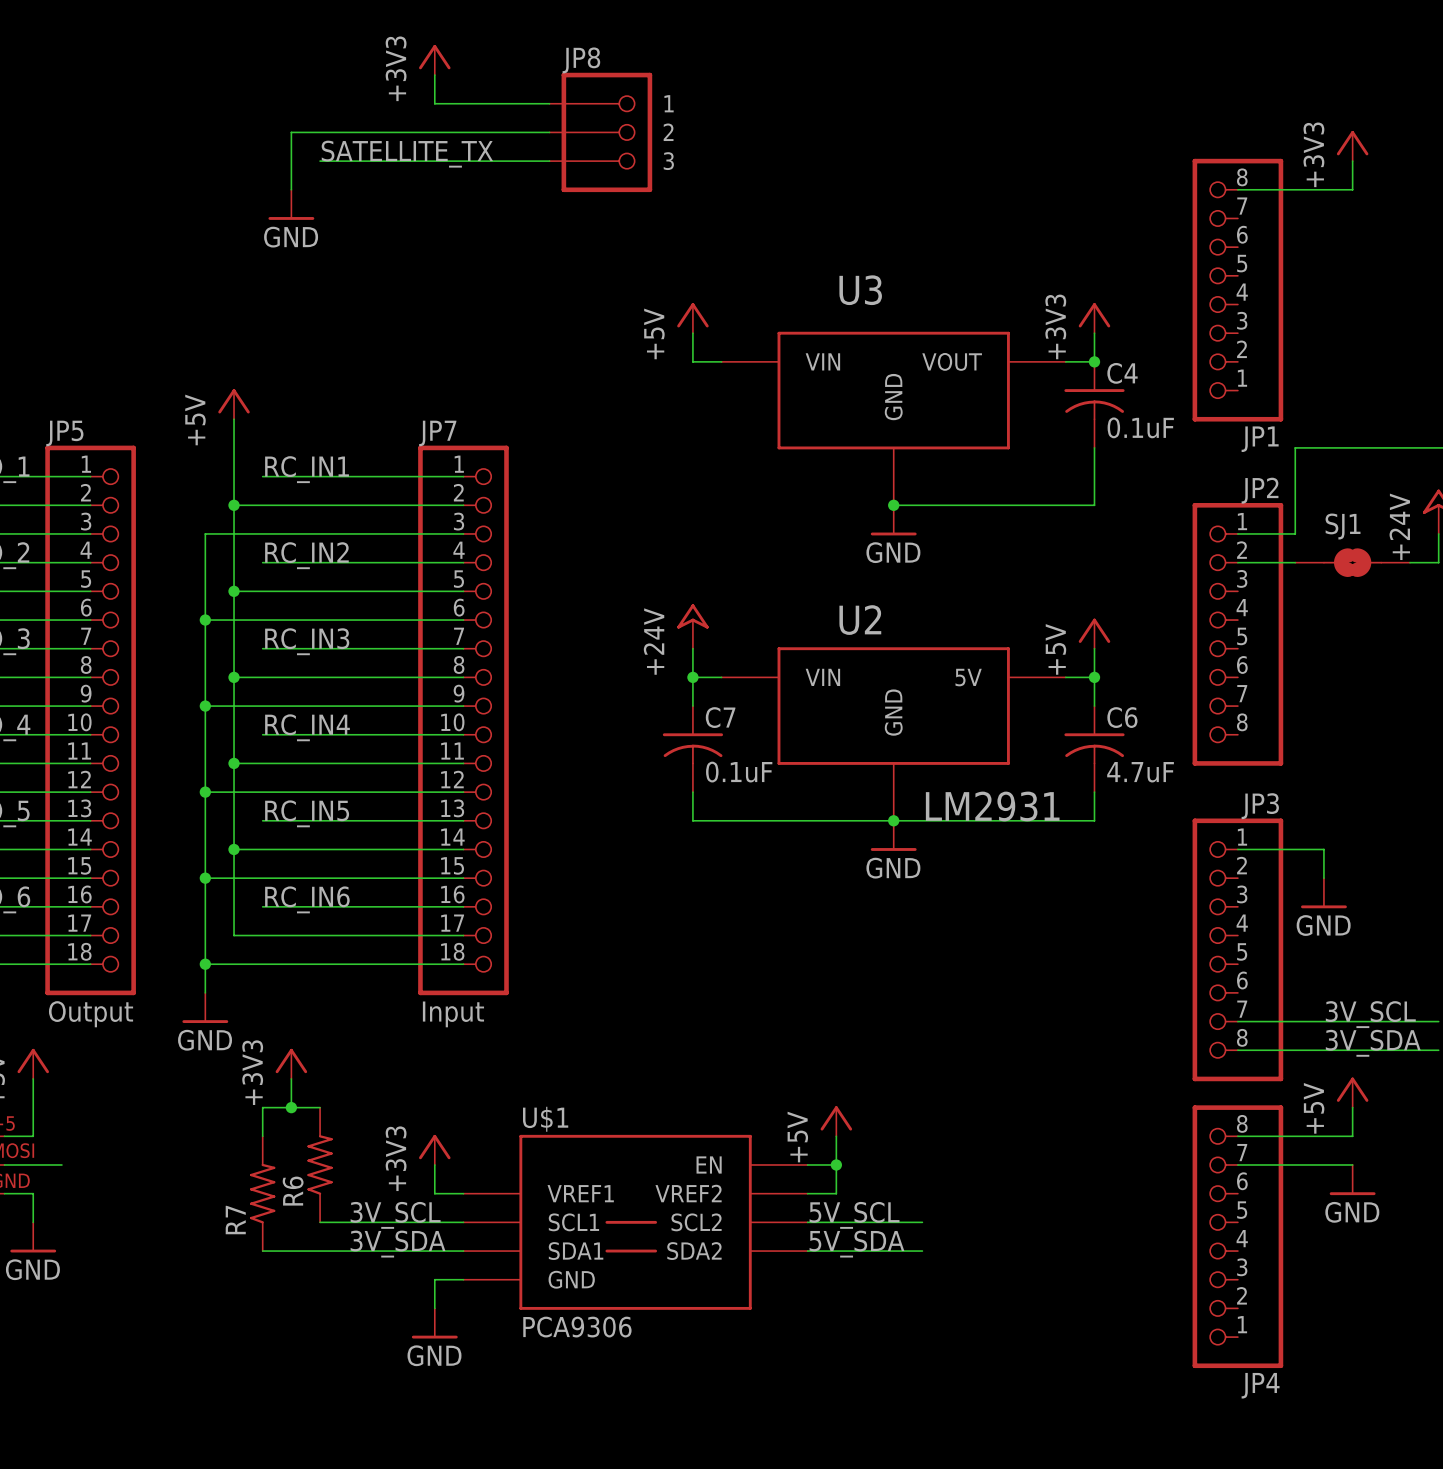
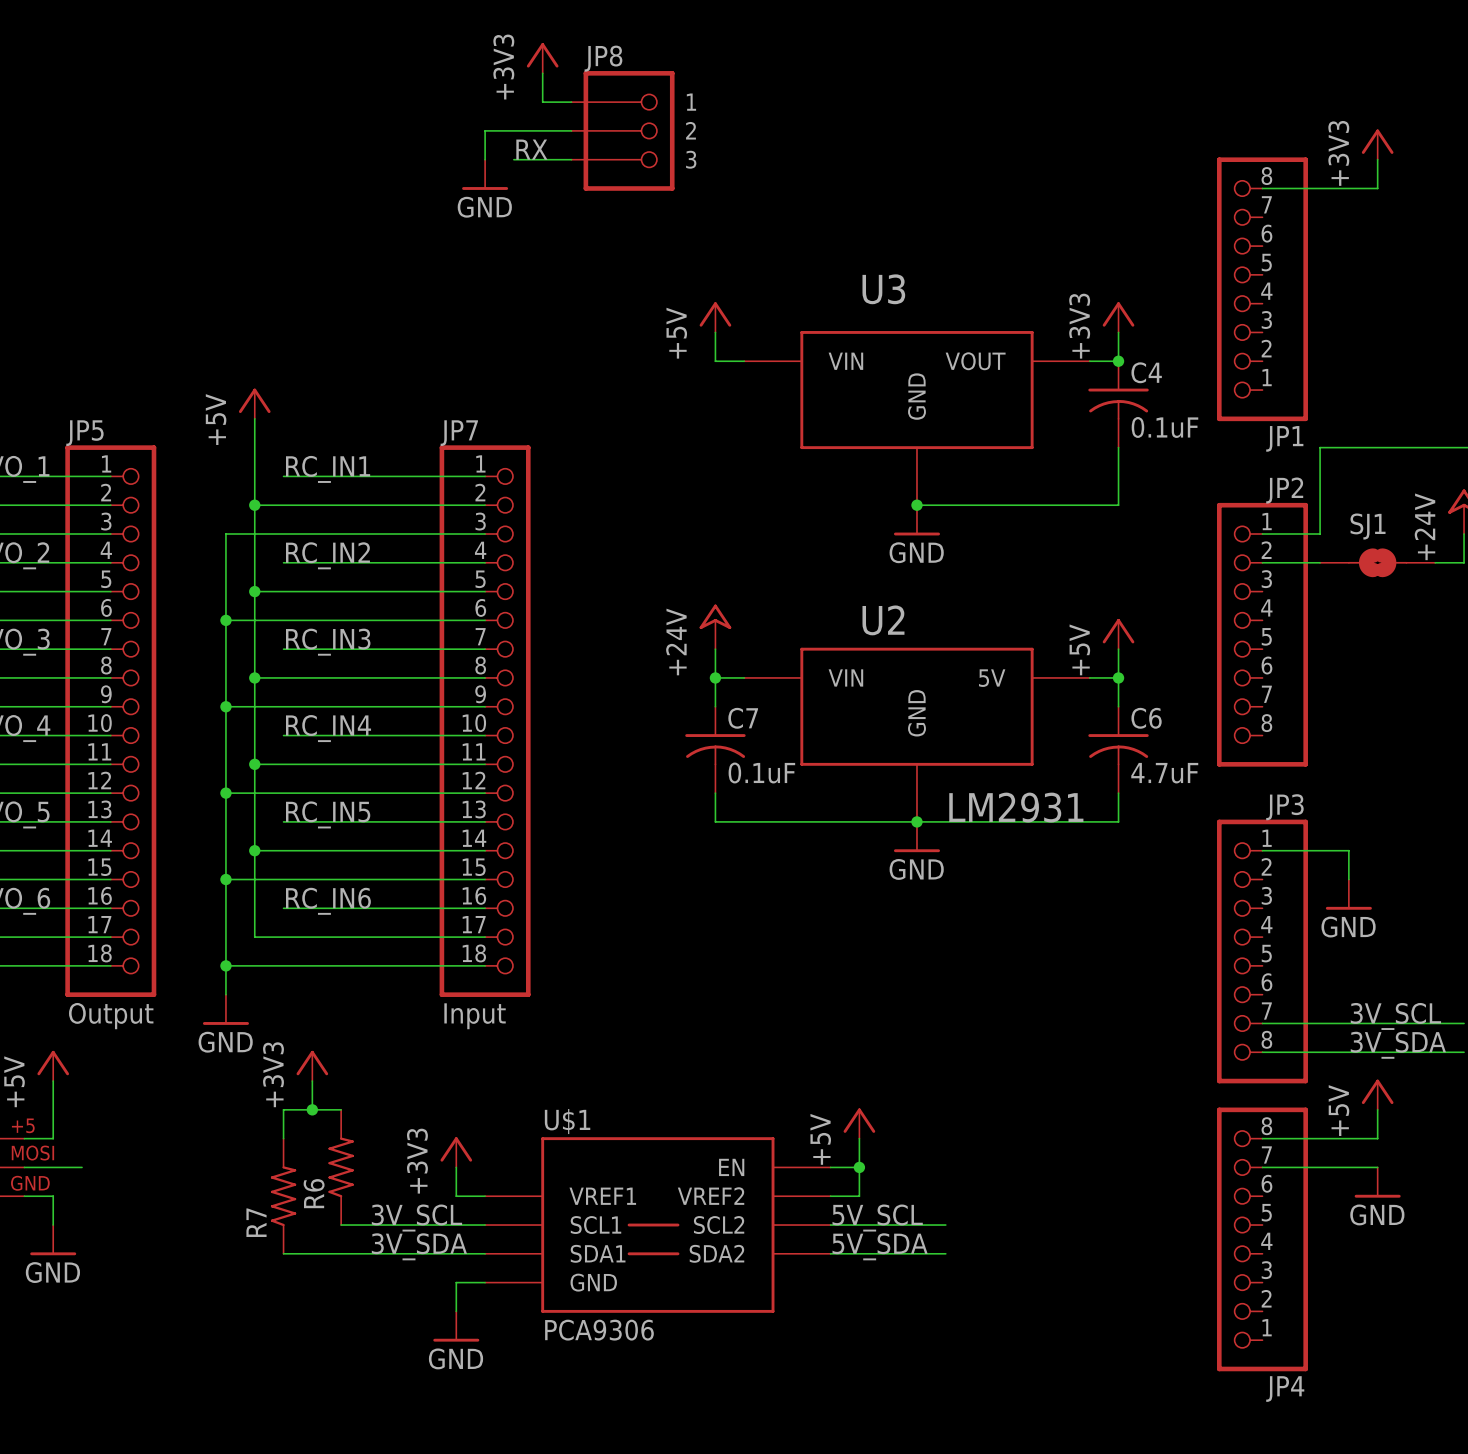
power symbol position: +3V3 (434, 60) -> +3V3 (542, 58)
wire: (434, 75) (434, 103) (520, 103) -> (542, 73) (542, 102)
wire: (463, 132) (291, 132) (291, 189) -> (485, 130) (485, 159)
label: none -> RX (531, 149)
label: SATELLITE_TX (407, 154) -> none
wire: (320, 161) (492, 161) -> none
power symbol position: GND (291, 204) -> GND (485, 174)

